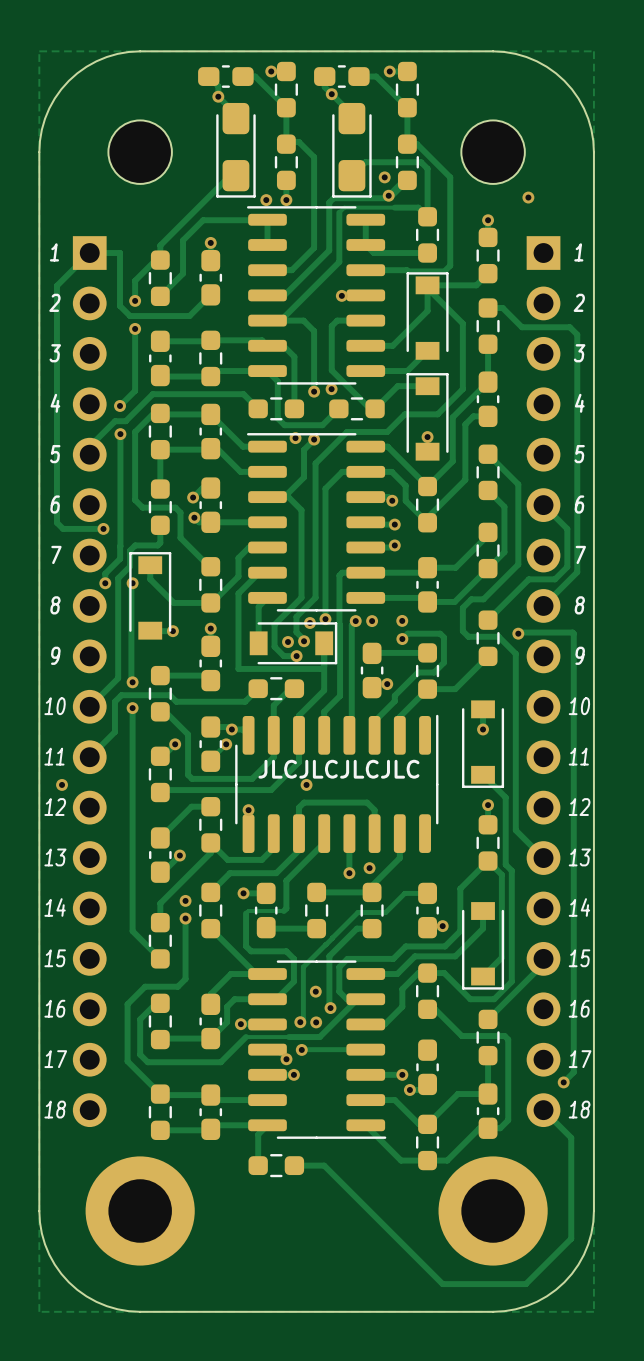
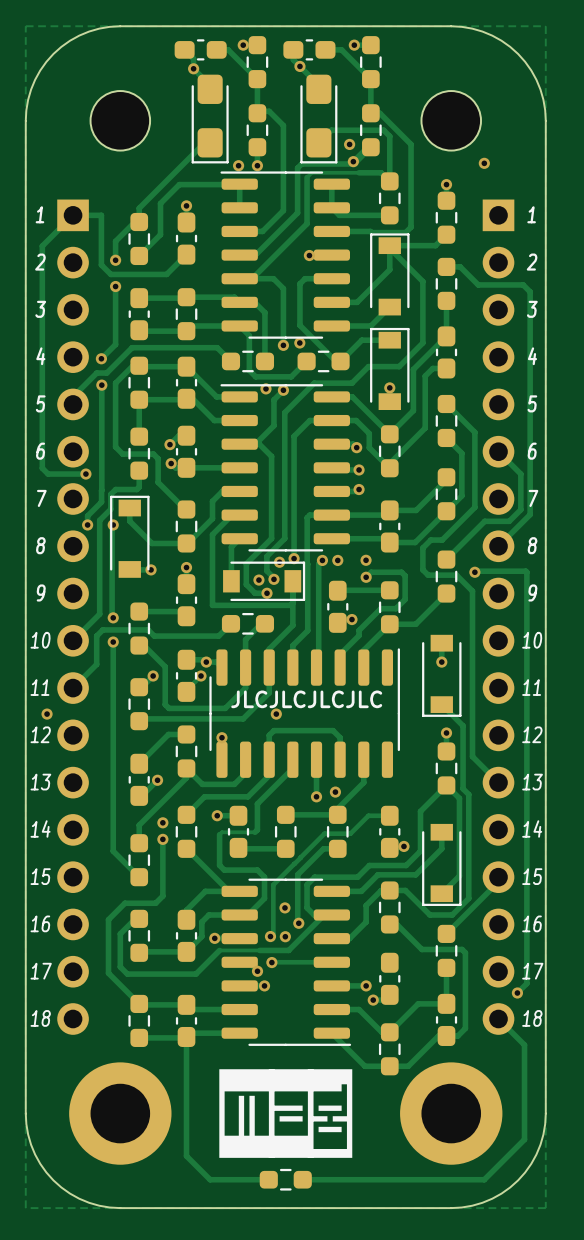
track: (267, 1125) (258, 1134) (258, 1165) -> none
track: none -> (186, 1036) (186, 1156) (210, 1179) (268, 1179)
drawing: none -> [219, 1069, 353, 1158]
part position: (276, 1165) -> (285, 1179)
track: (294, 1165) (324, 1165) (442, 1284) (525, 1284) (528, 1281) -> (302, 1179) (484, 1179)

